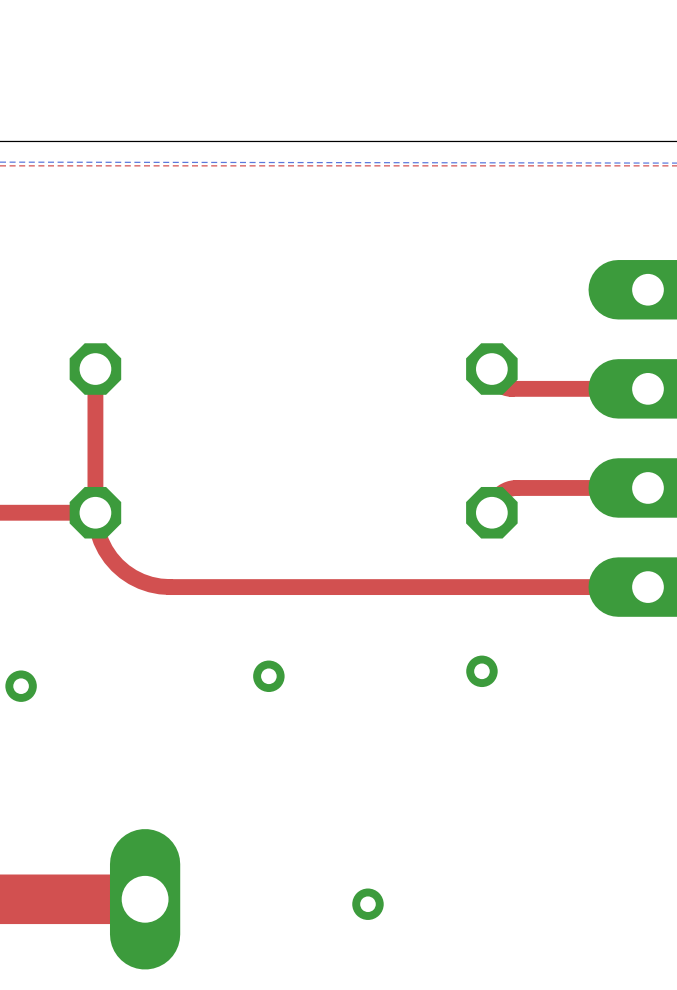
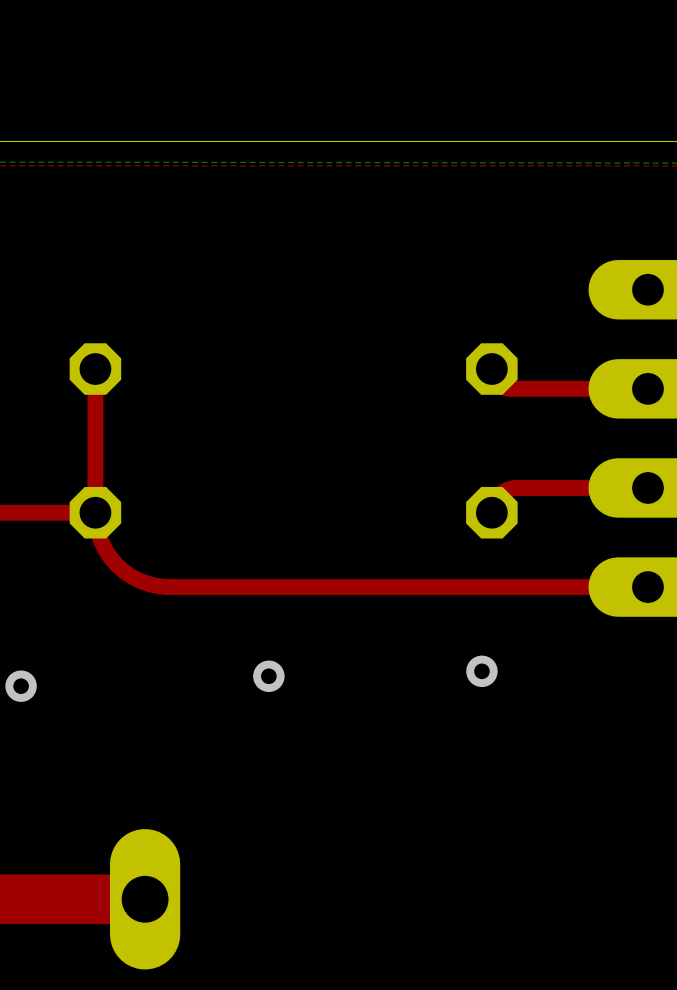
via: (367, 904) -> none

